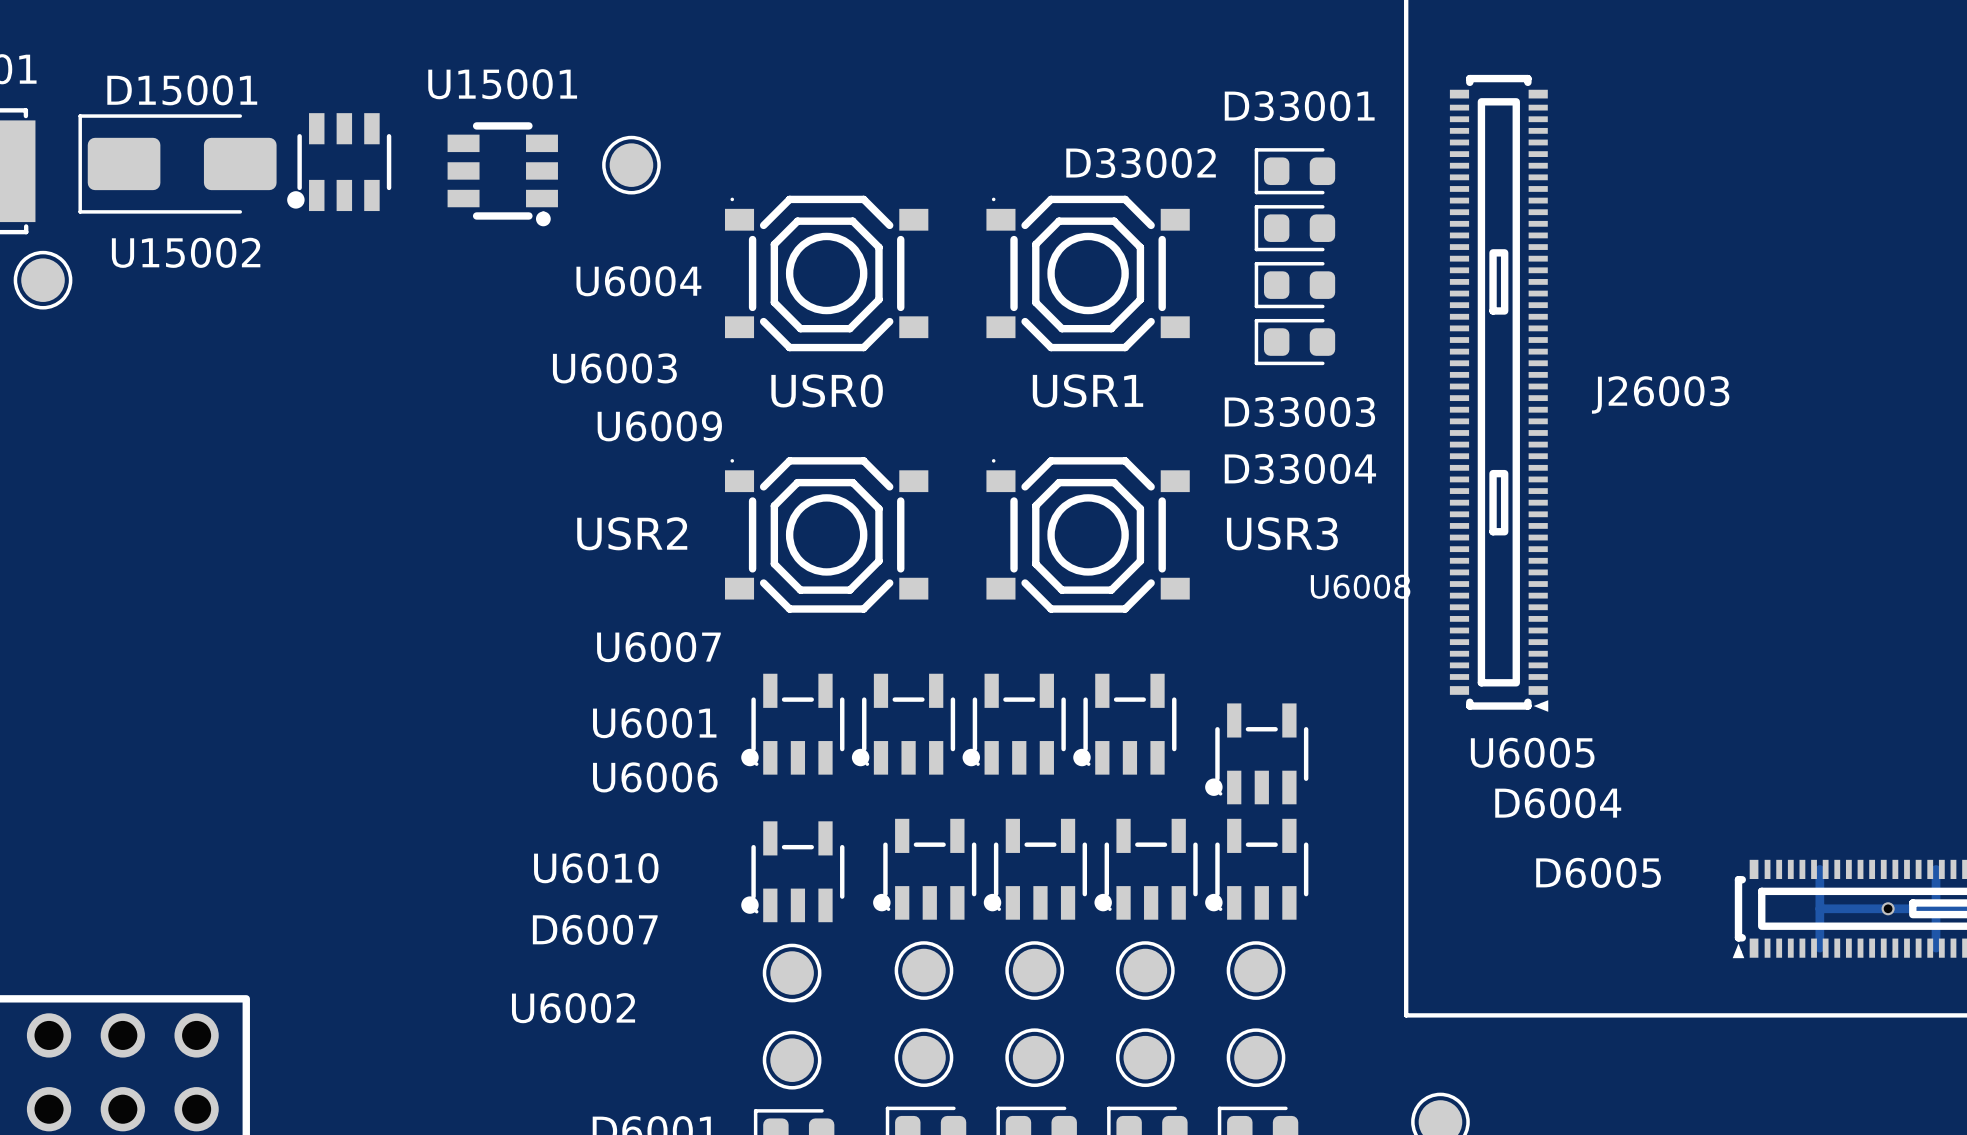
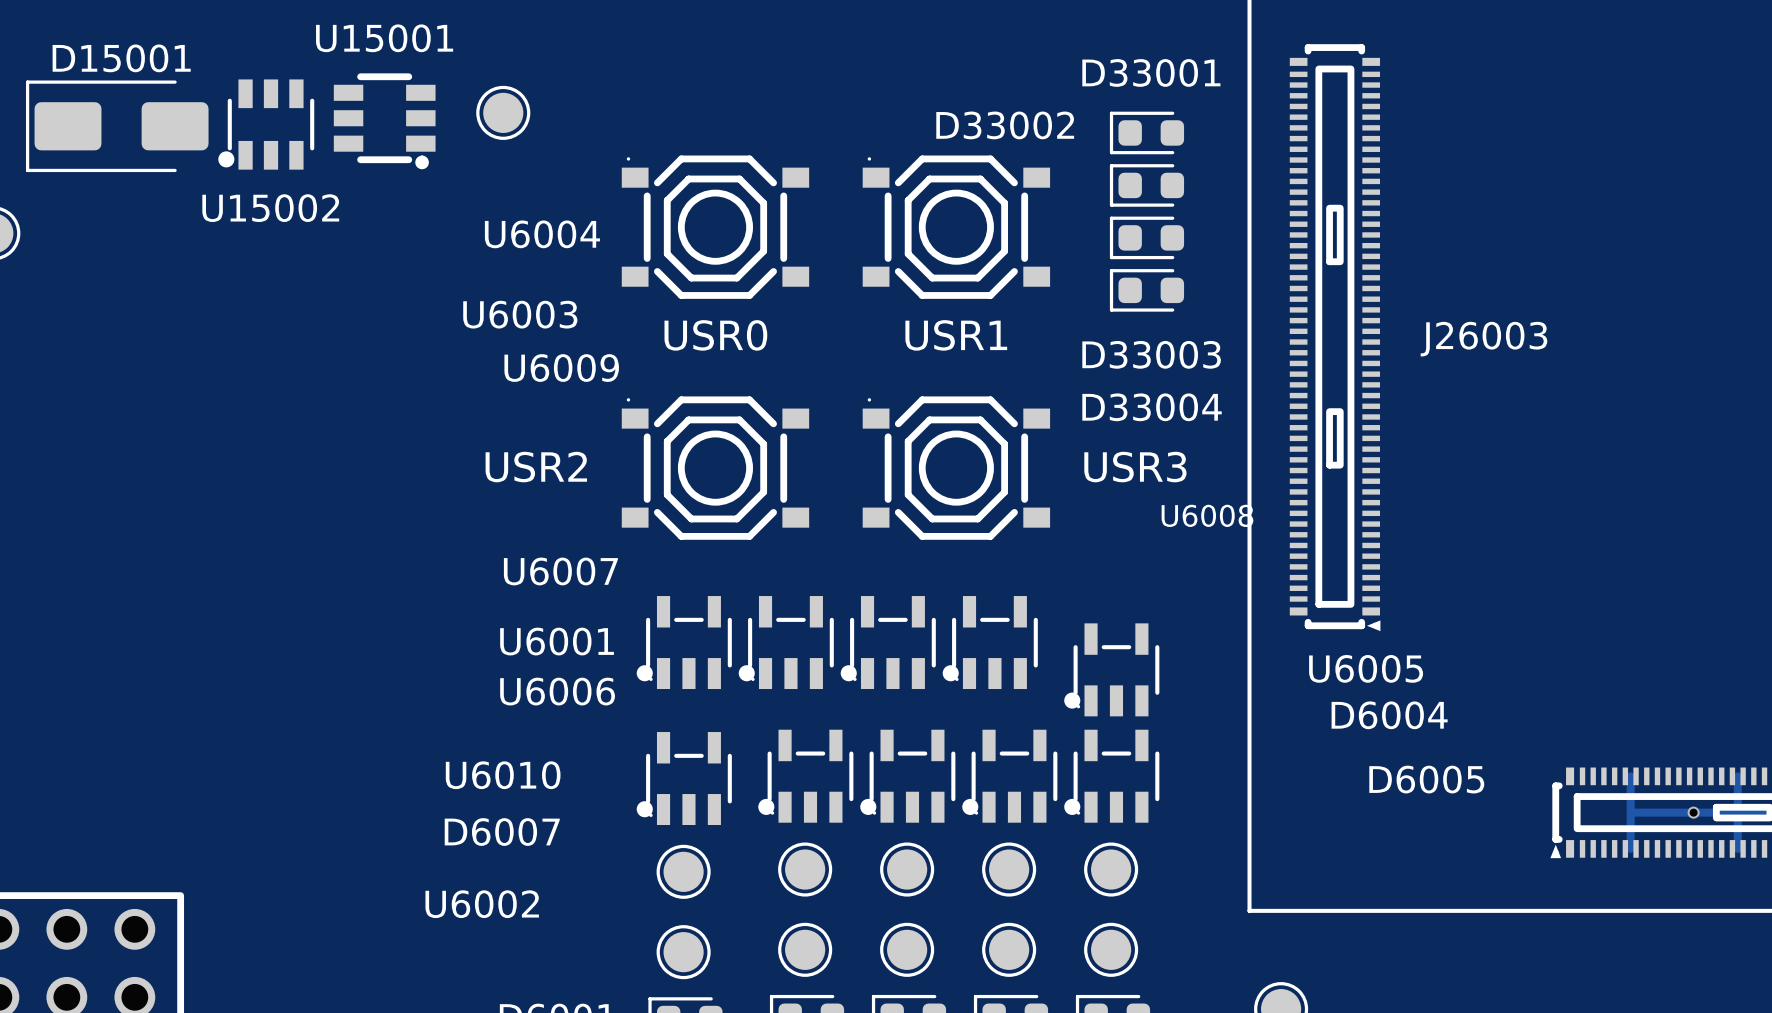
part position: (631, 165) -> (503, 112)
U15001 position: (502, 174) -> (384, 121)
U15002 name position: U15002 (186, 252) -> U15002 (270, 208)

